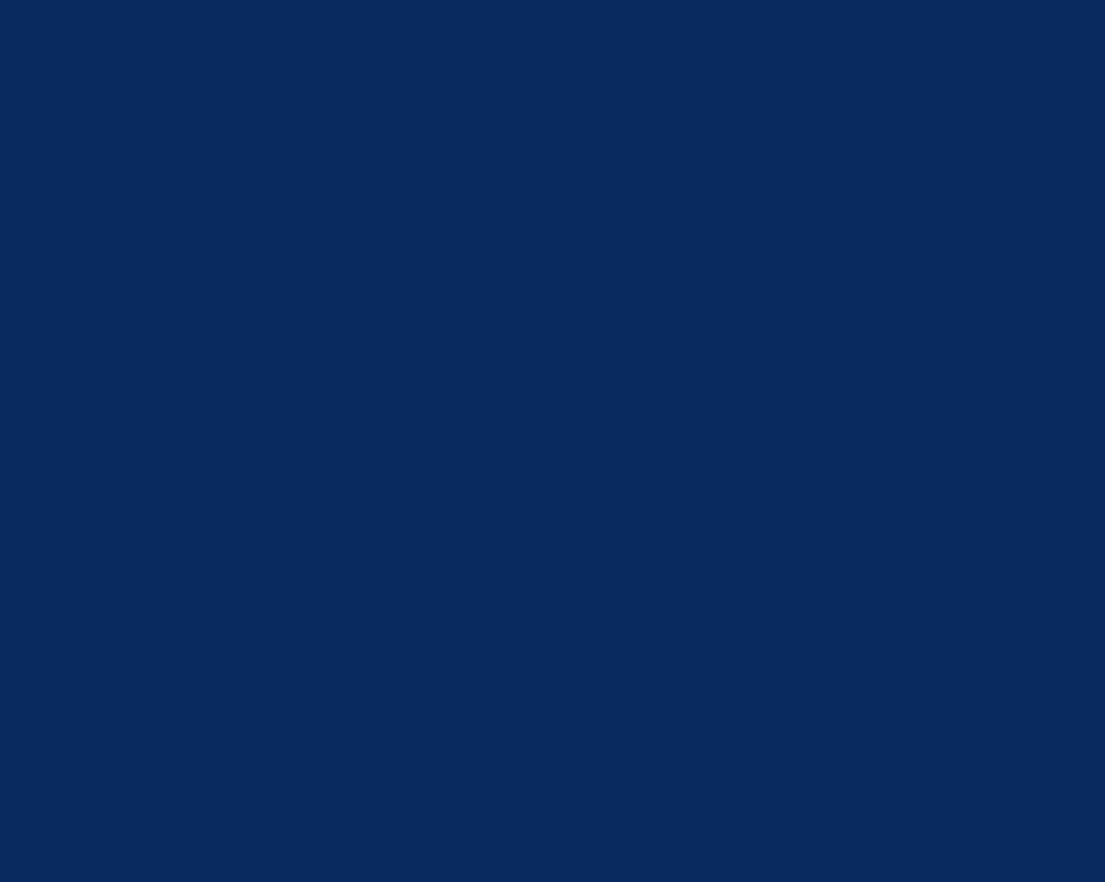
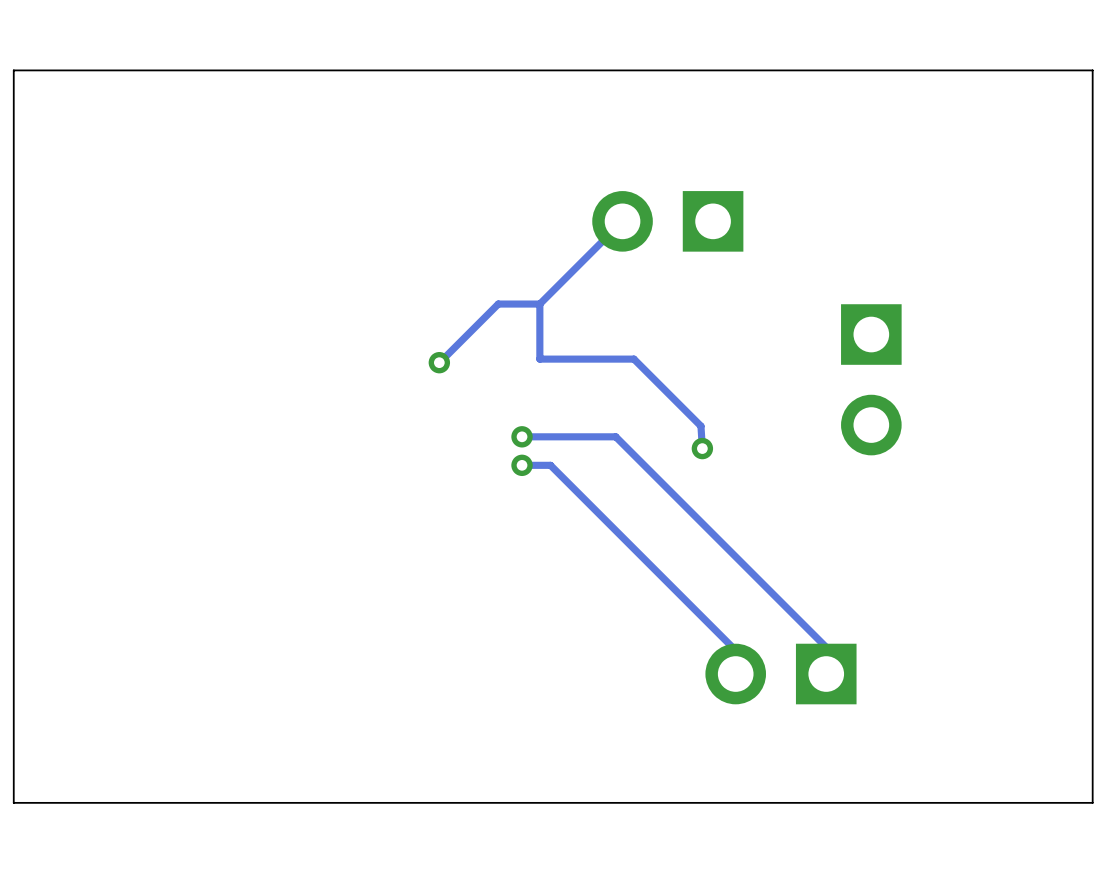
board edge: none -> (1092, 70) (13, 70) (13, 802) (1092, 802) (1092, 70)
track: none -> (622, 221) (539, 304)
part: none -> (667, 221)
track: none -> (539, 304) (498, 304) (439, 363)
track: none -> (539, 304) (539, 359) (633, 359) (700, 426) (700, 449)
via: none -> (439, 362)
part: none -> (871, 379)
track: none -> (522, 436) (615, 436) (826, 647) (826, 674)
via: none -> (522, 436)
via: none -> (702, 448)
track: none -> (522, 465) (550, 465) (735, 650) (735, 674)
via: none -> (522, 465)
part: none -> (780, 674)

